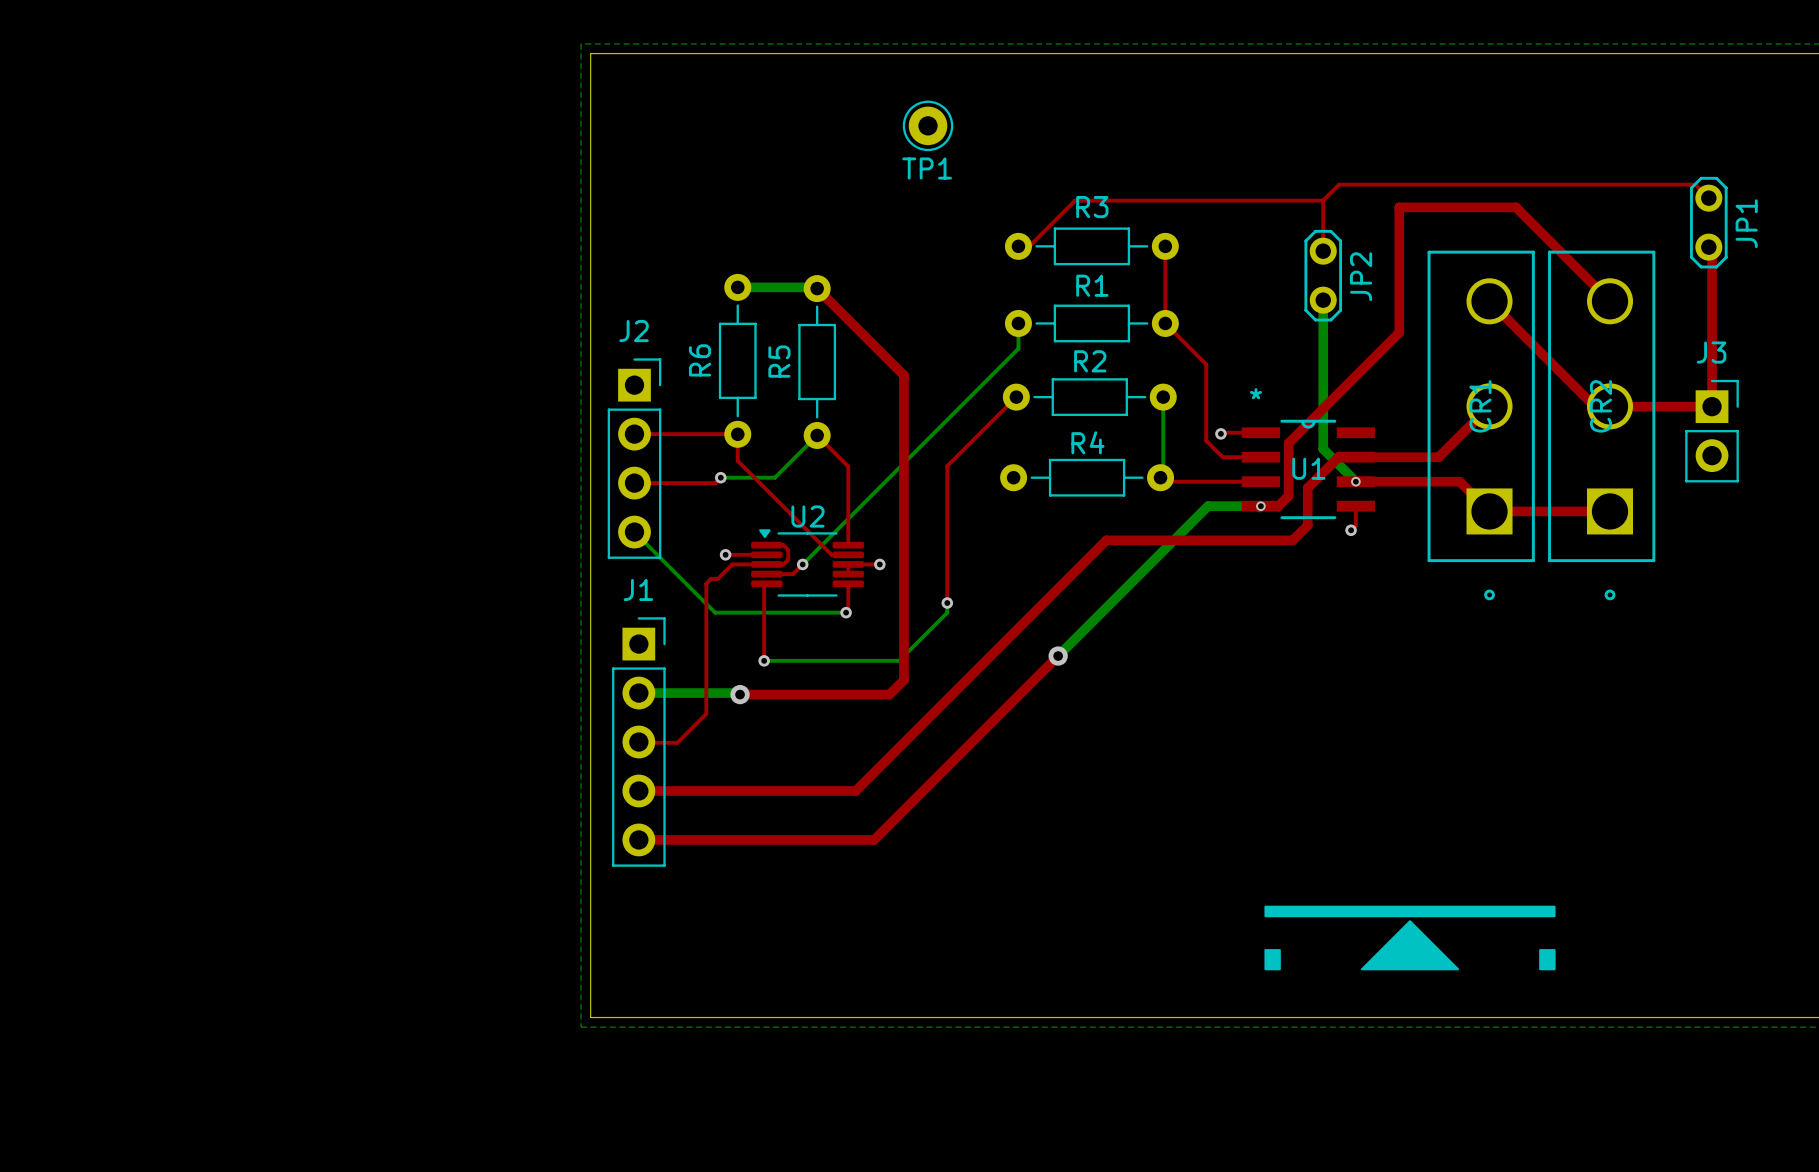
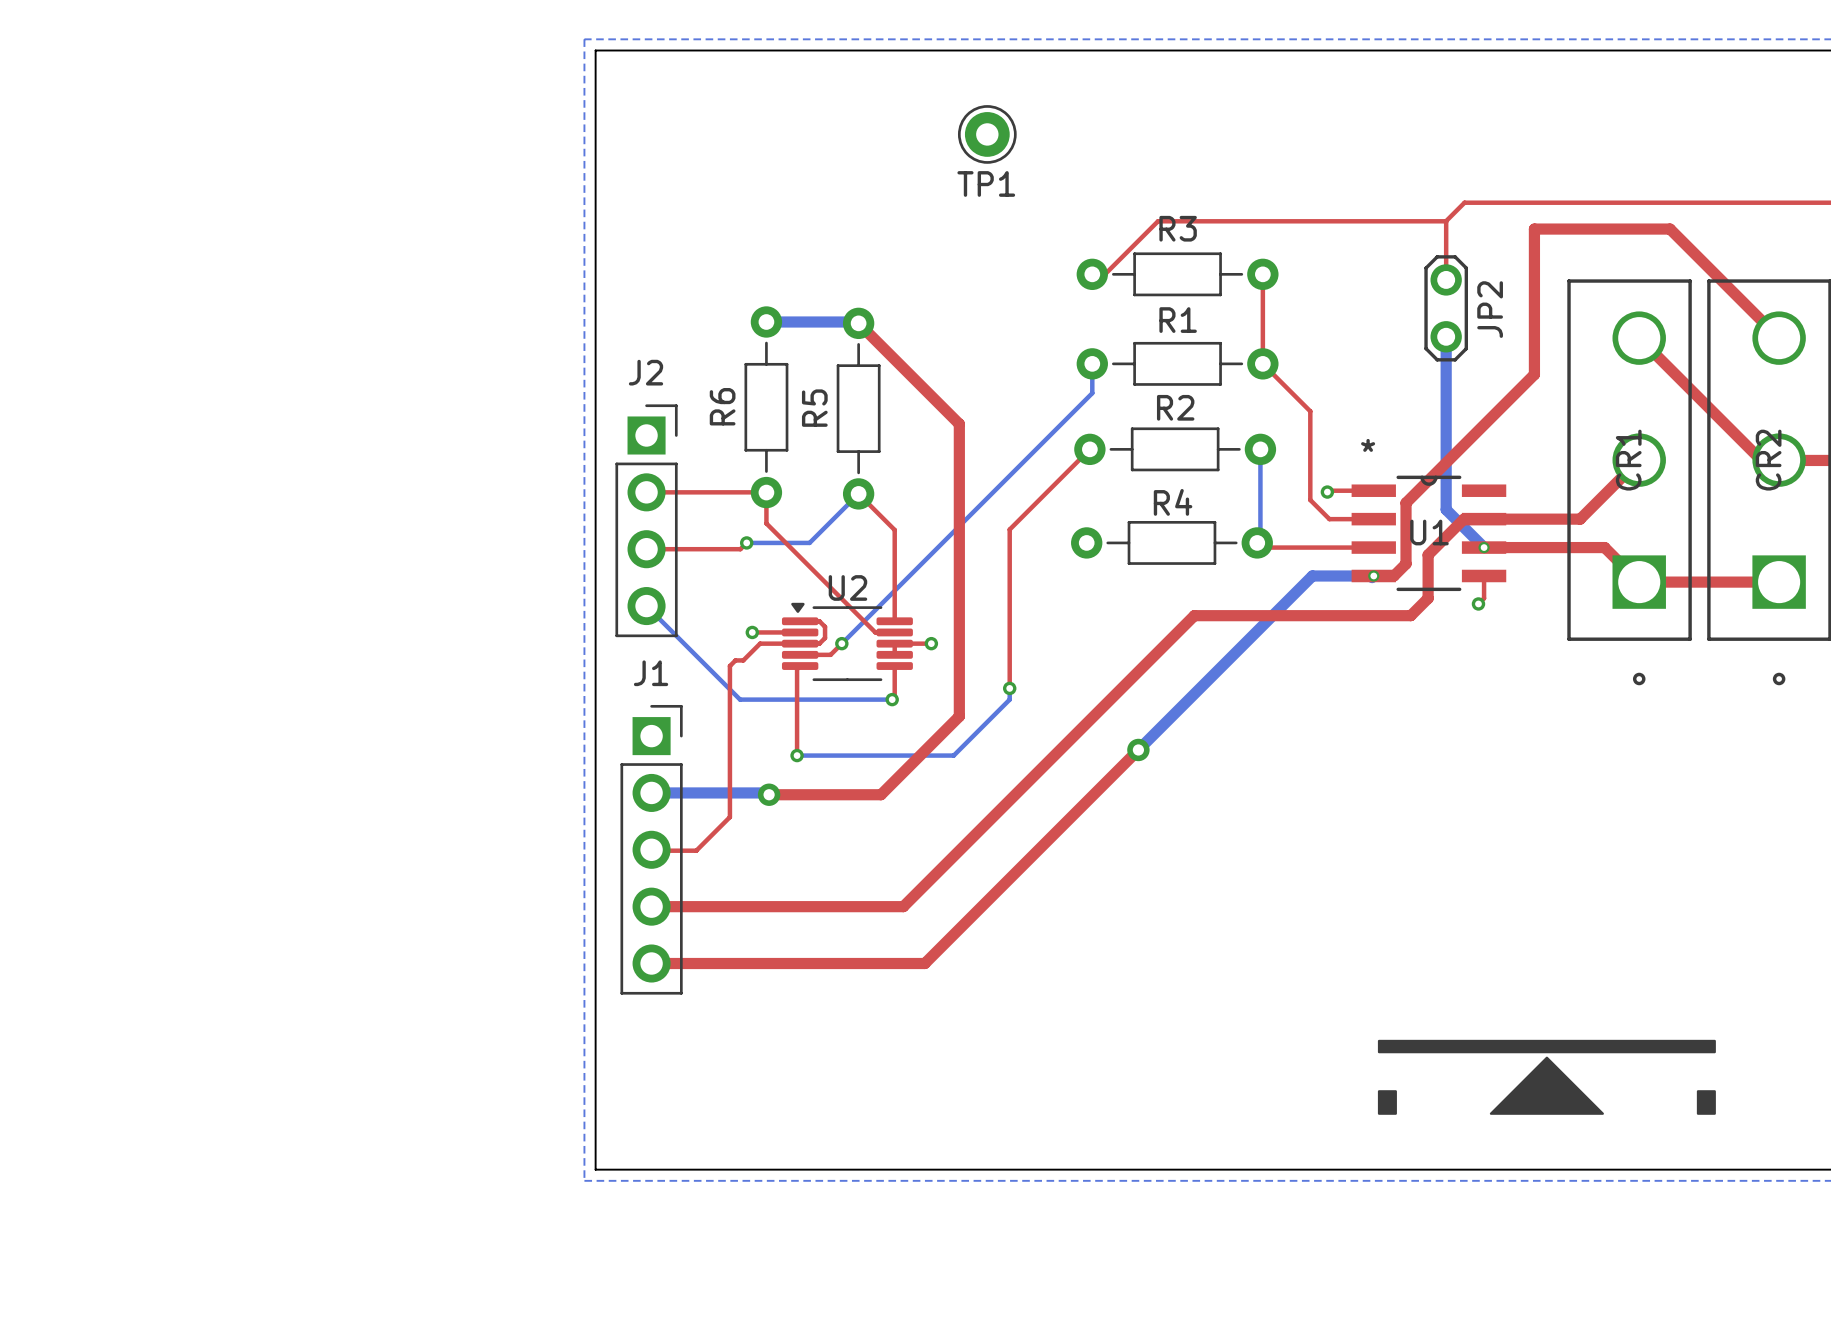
top track: (903, 627) (903, 680) (889, 694) (836, 694) -> (959, 716) (881, 794)

